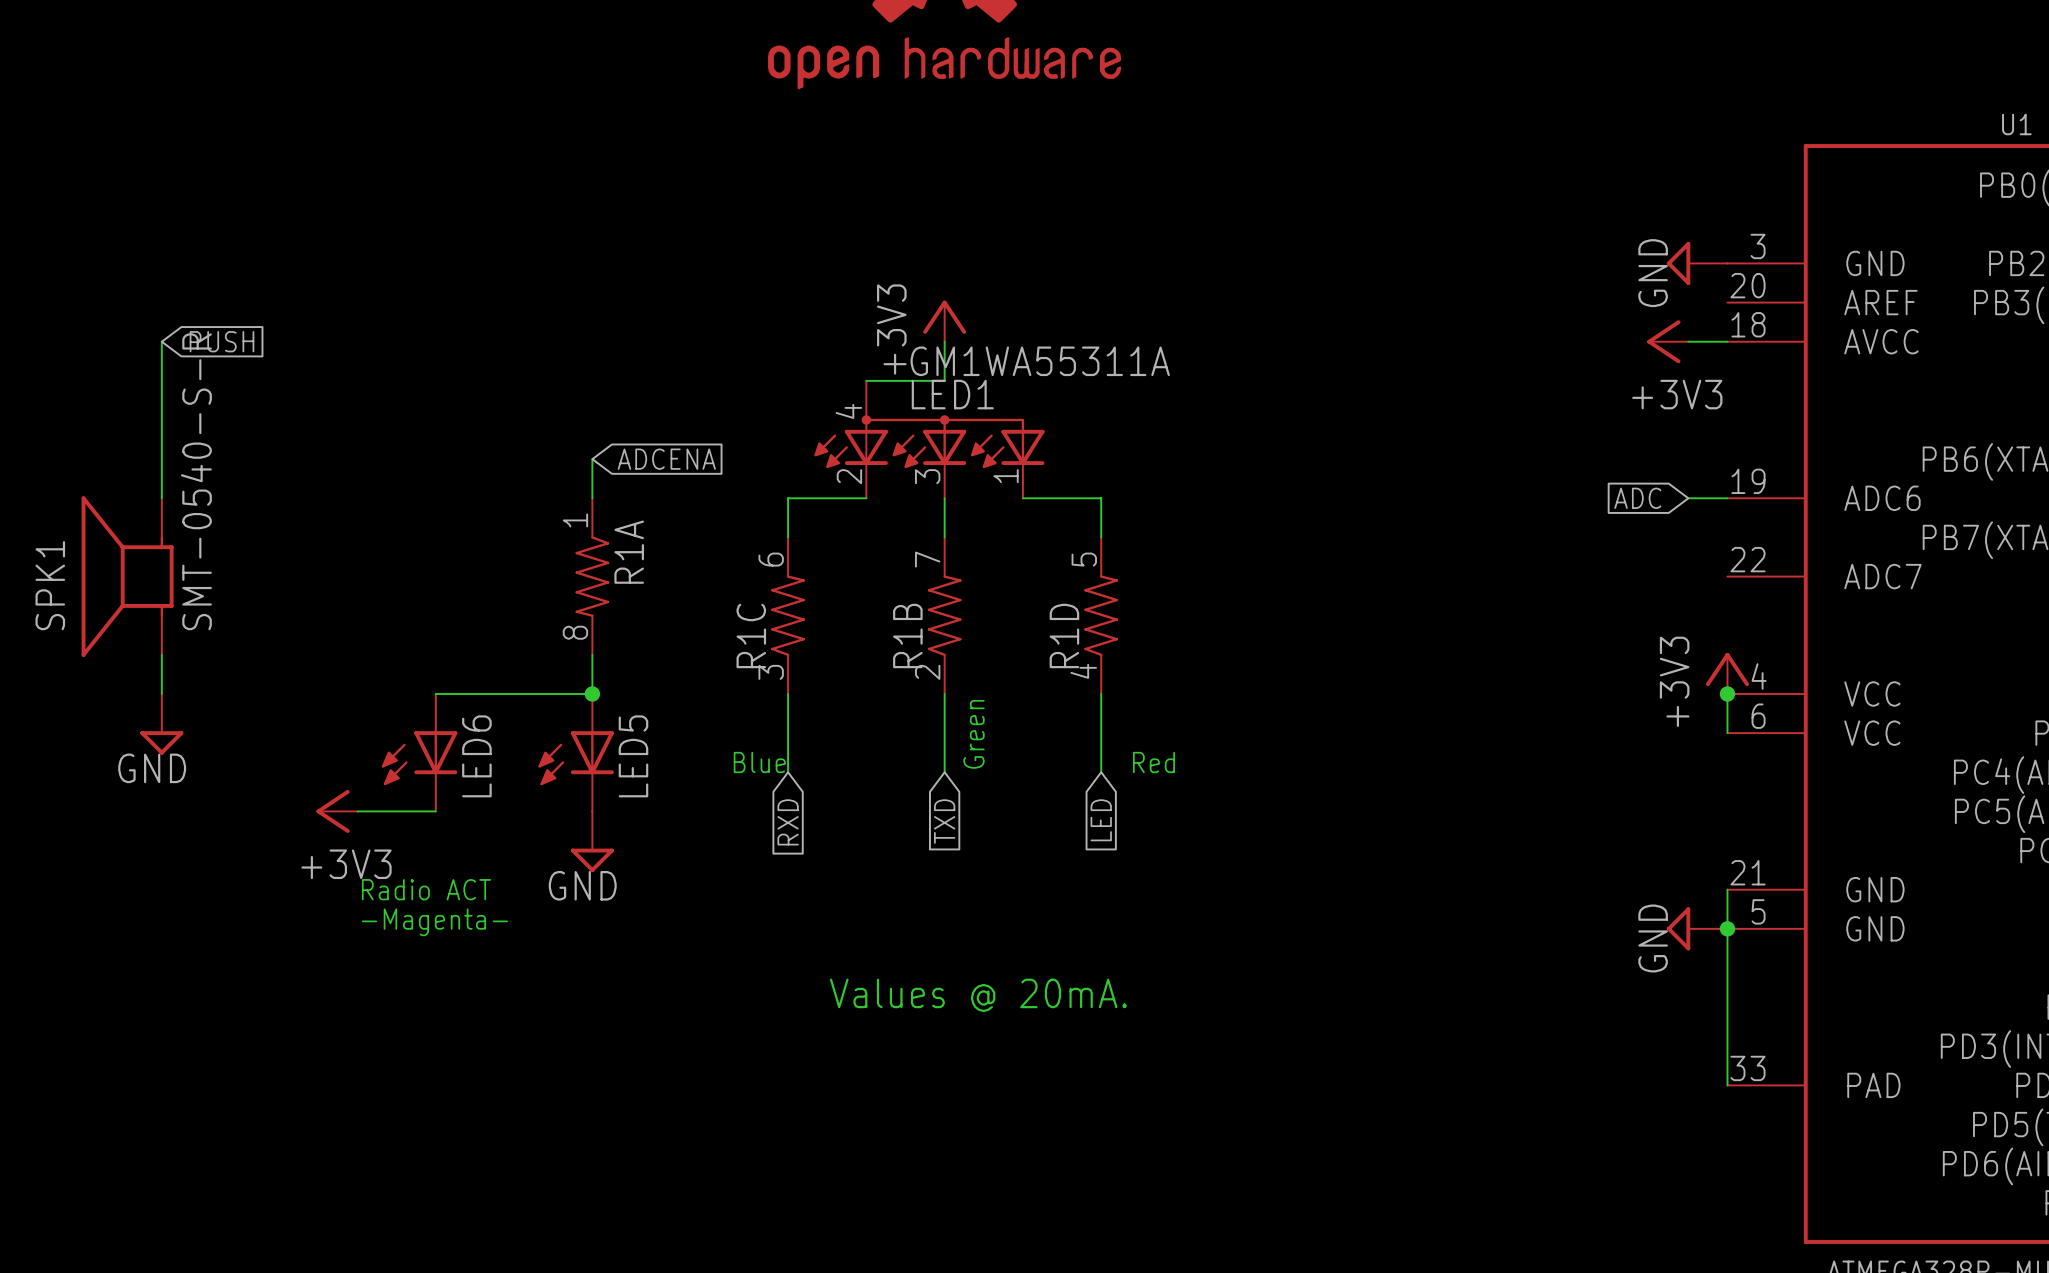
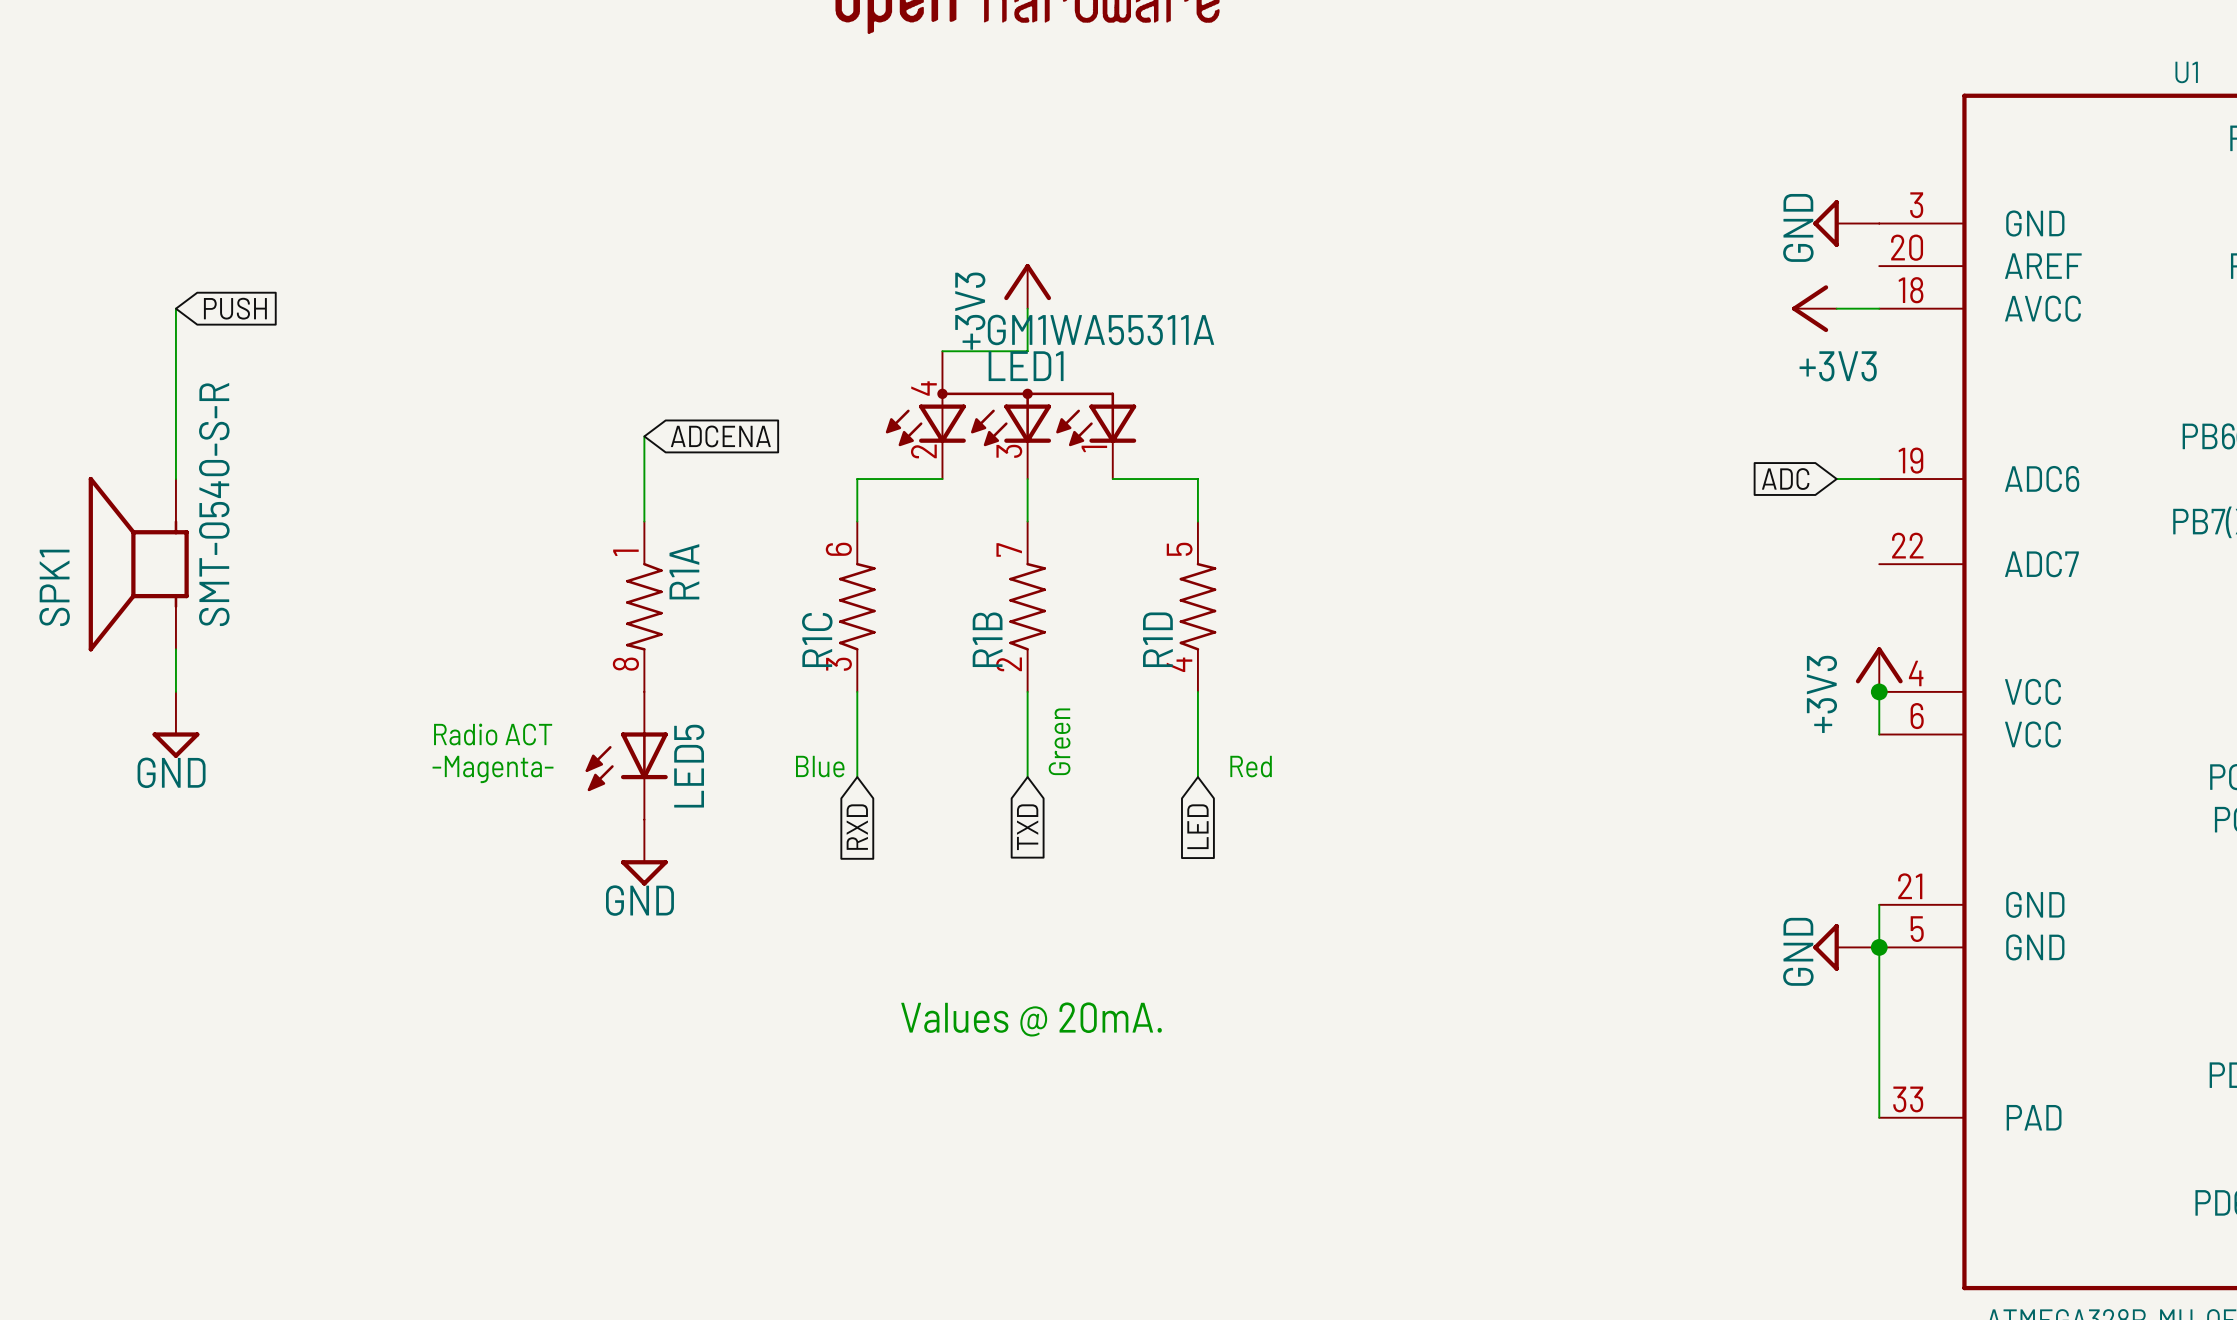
R1A position: (592, 576) -> (644, 606)
wire: (592, 654) (592, 693) (435, 693) -> none
junction: (592, 693) -> none
LED6: (419, 752) -> none
power symbol: +3V3 (336, 811) -> none
wire: (357, 811) (435, 811) -> none
text position: Radio ACT (426, 889) -> Radio ACT (493, 734)
text position: -Magenta- (434, 922) -> -Magenta- (493, 769)

